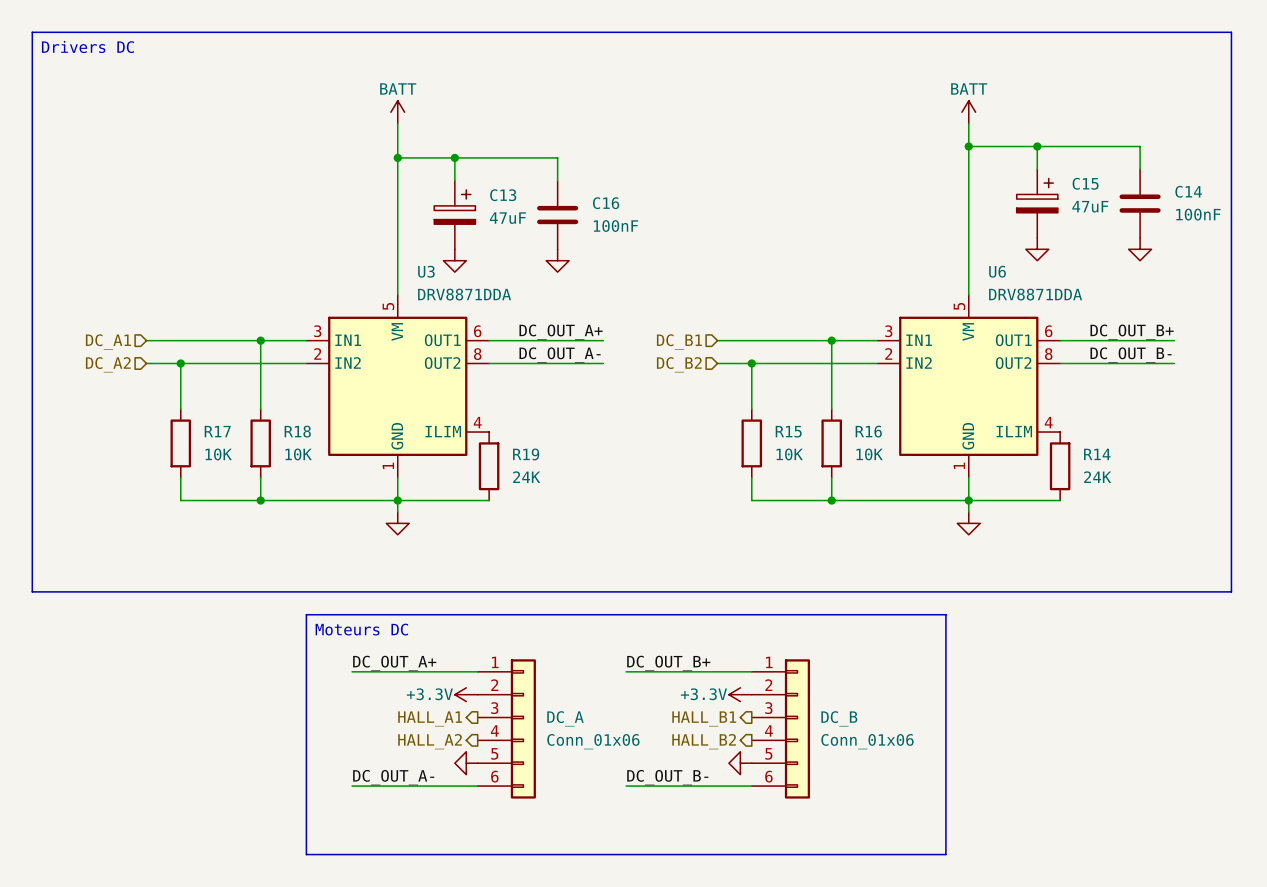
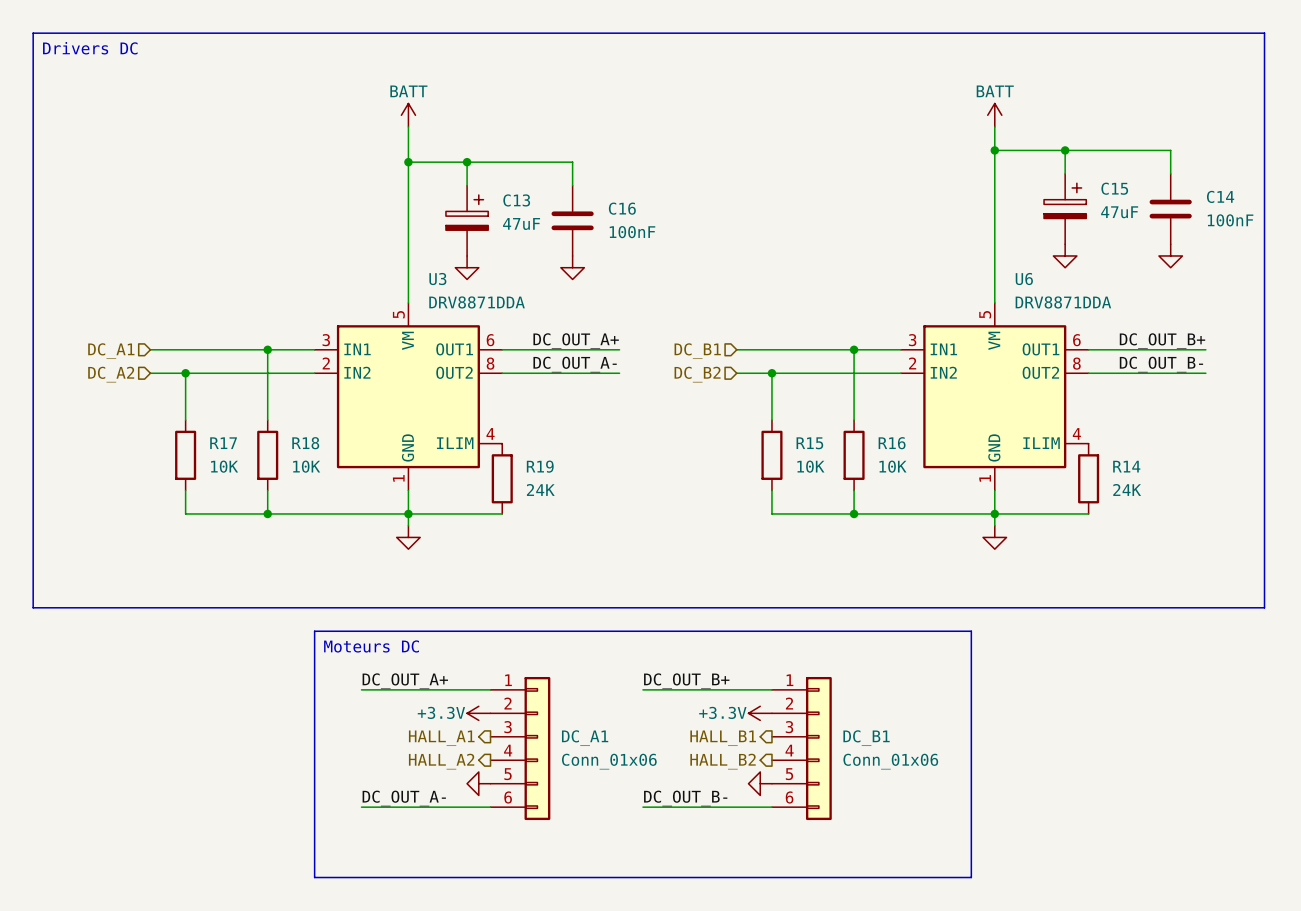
DC_A name: DC_A (565, 718) -> DC_A1 (585, 738)
DC_B name: DC_B (839, 718) -> DC_B1 (866, 738)

